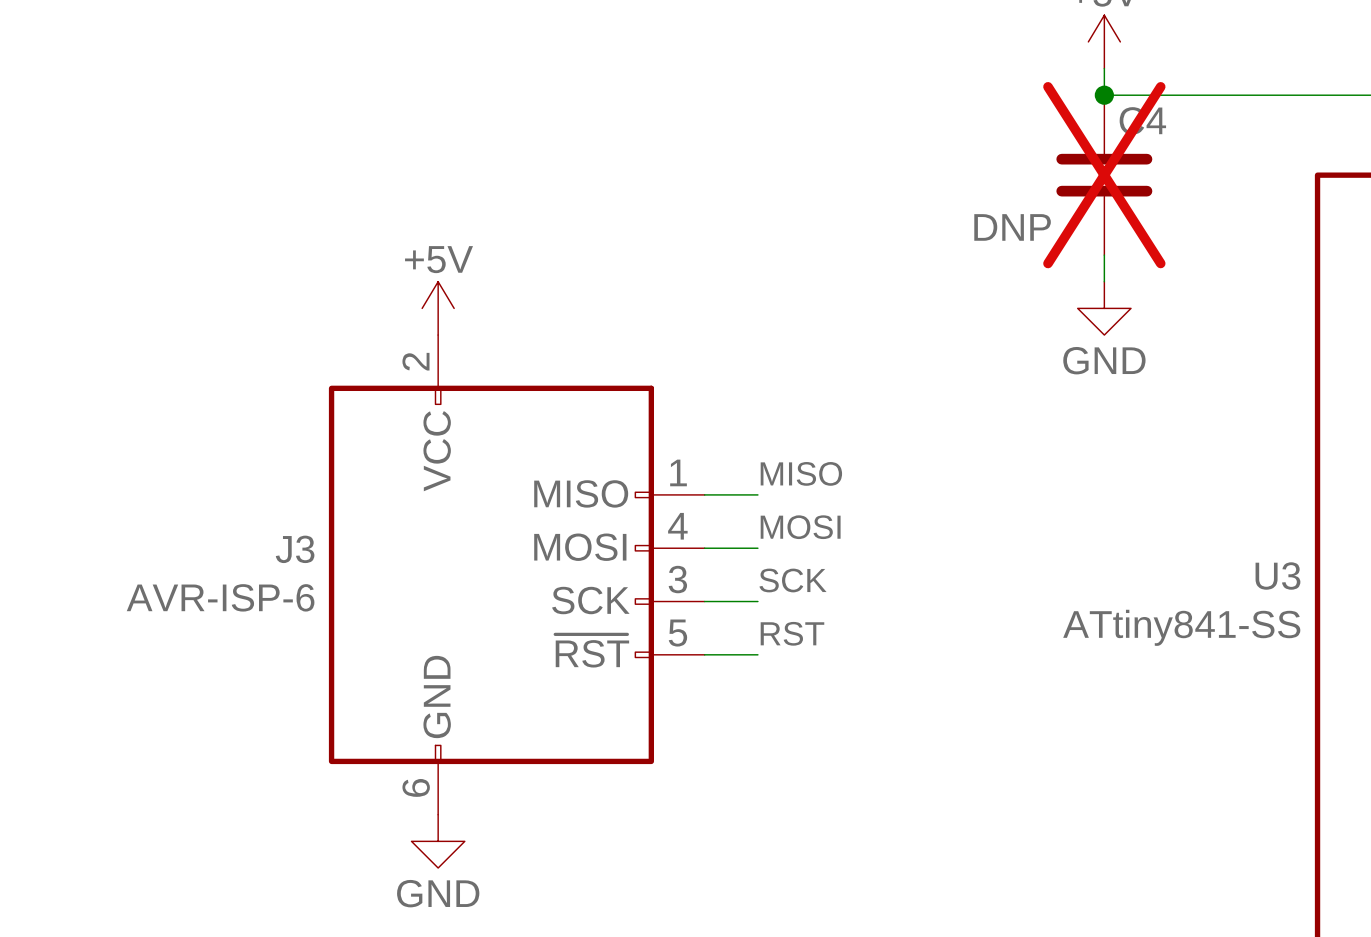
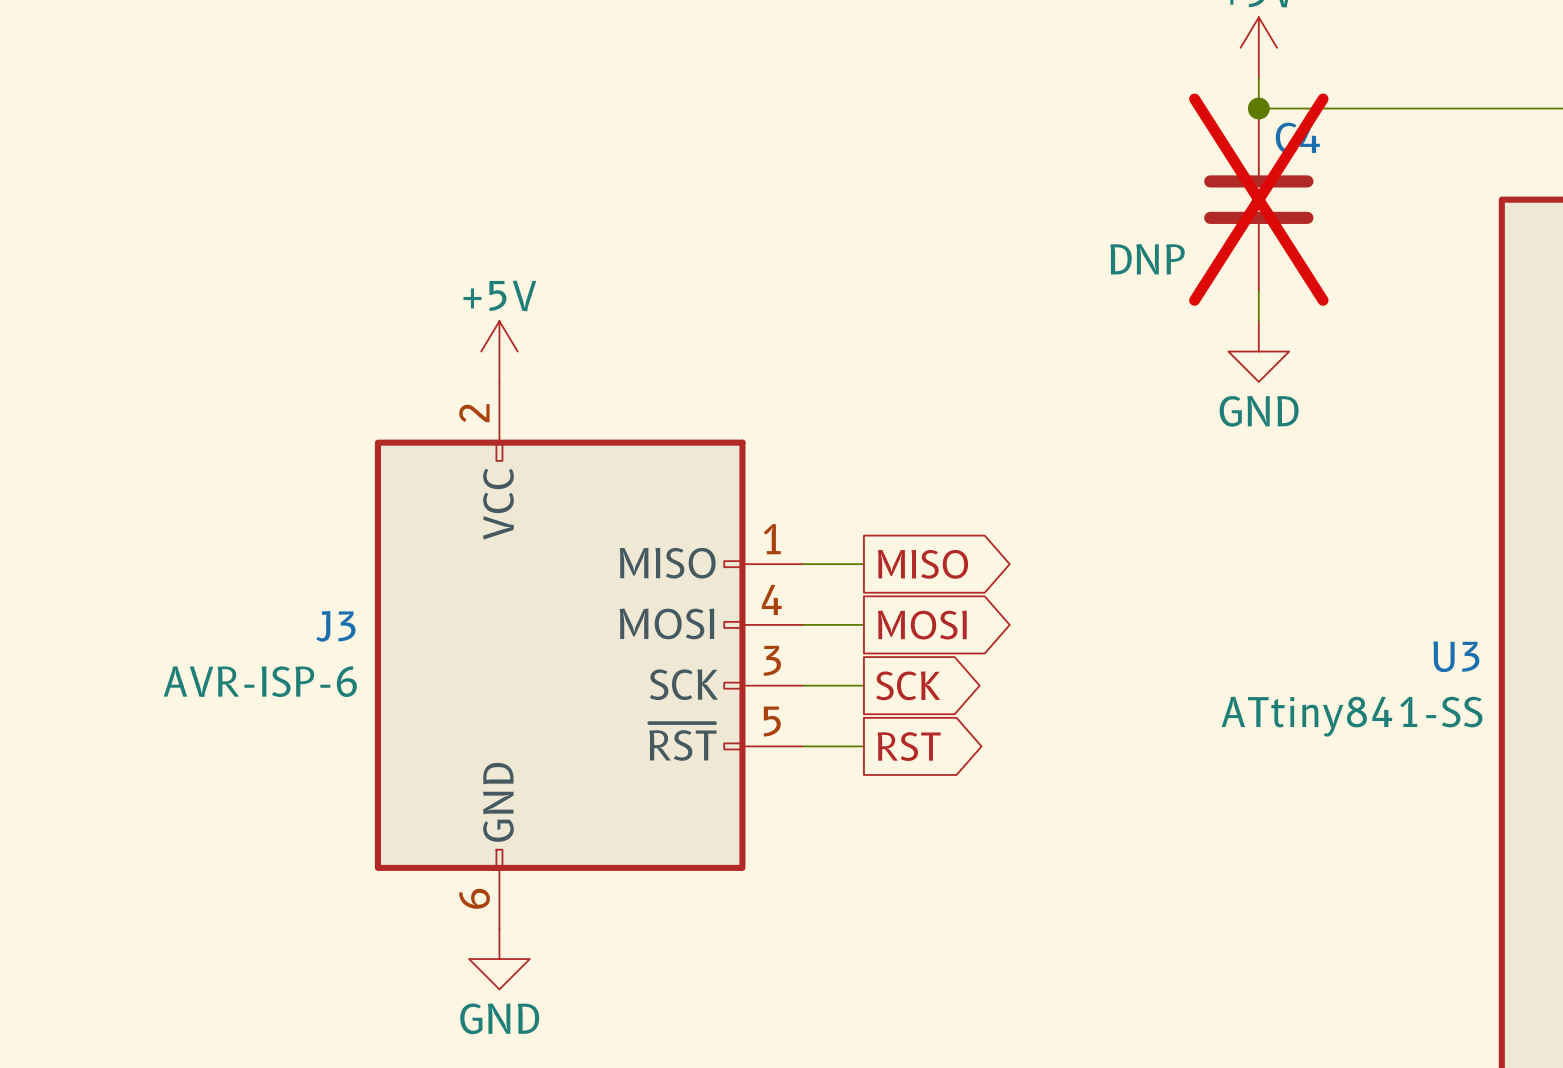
label: MISO (801, 473) -> none
global label: none -> MISO (922, 564)
label: MOSI (800, 527) -> none
global label: none -> MOSI (922, 625)
label: SCK (793, 580) -> none
global label: none -> SCK (908, 685)
label: RST (792, 633) -> none
global label: none -> RST (909, 746)

